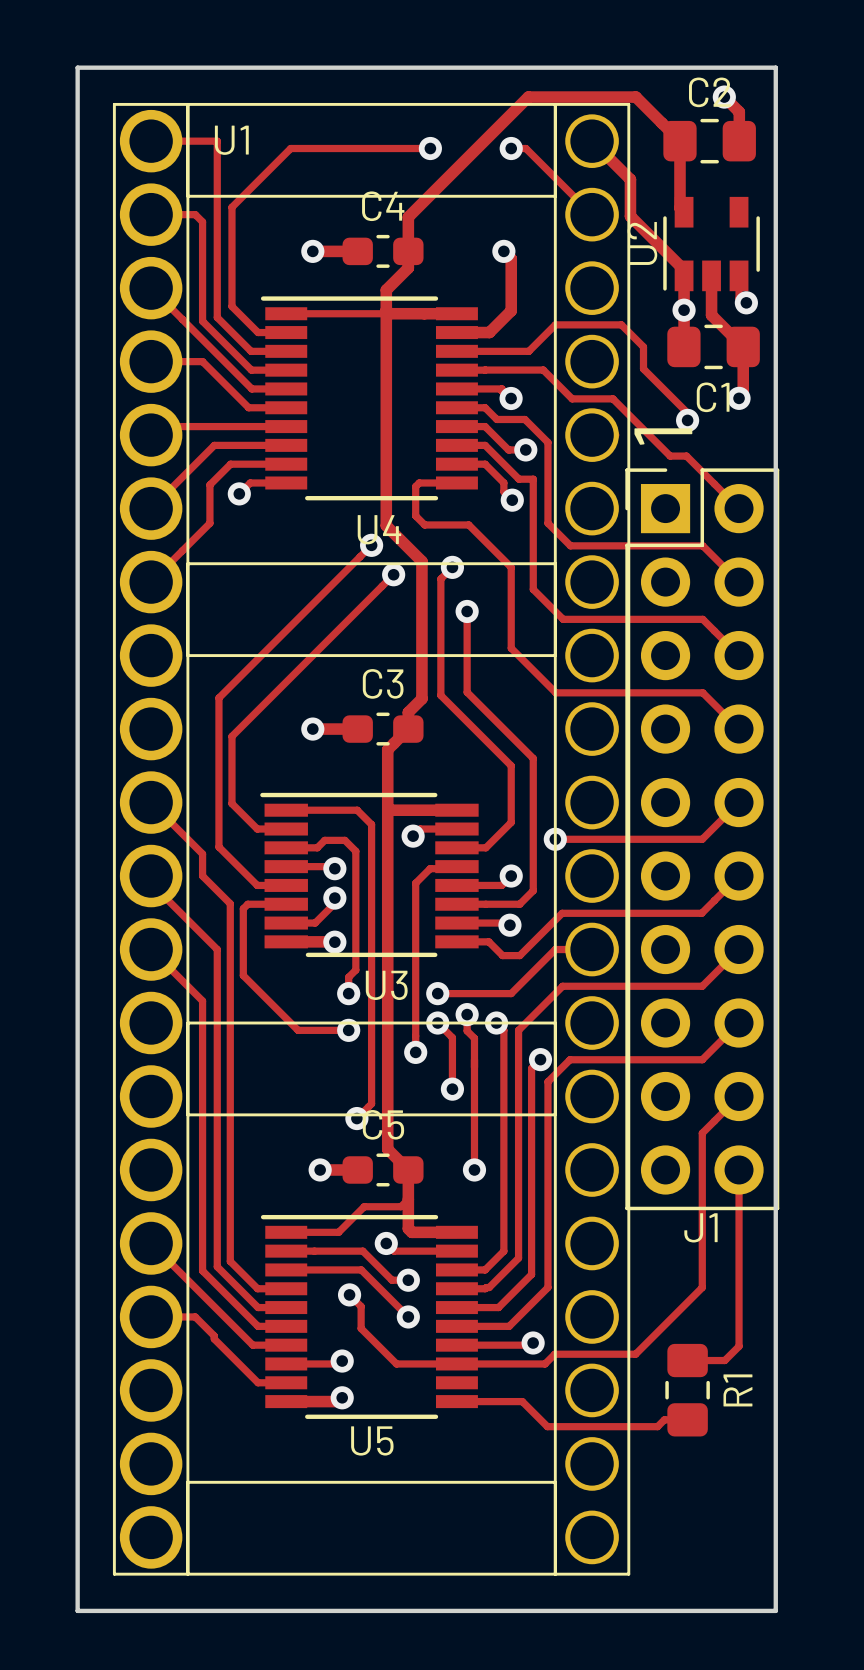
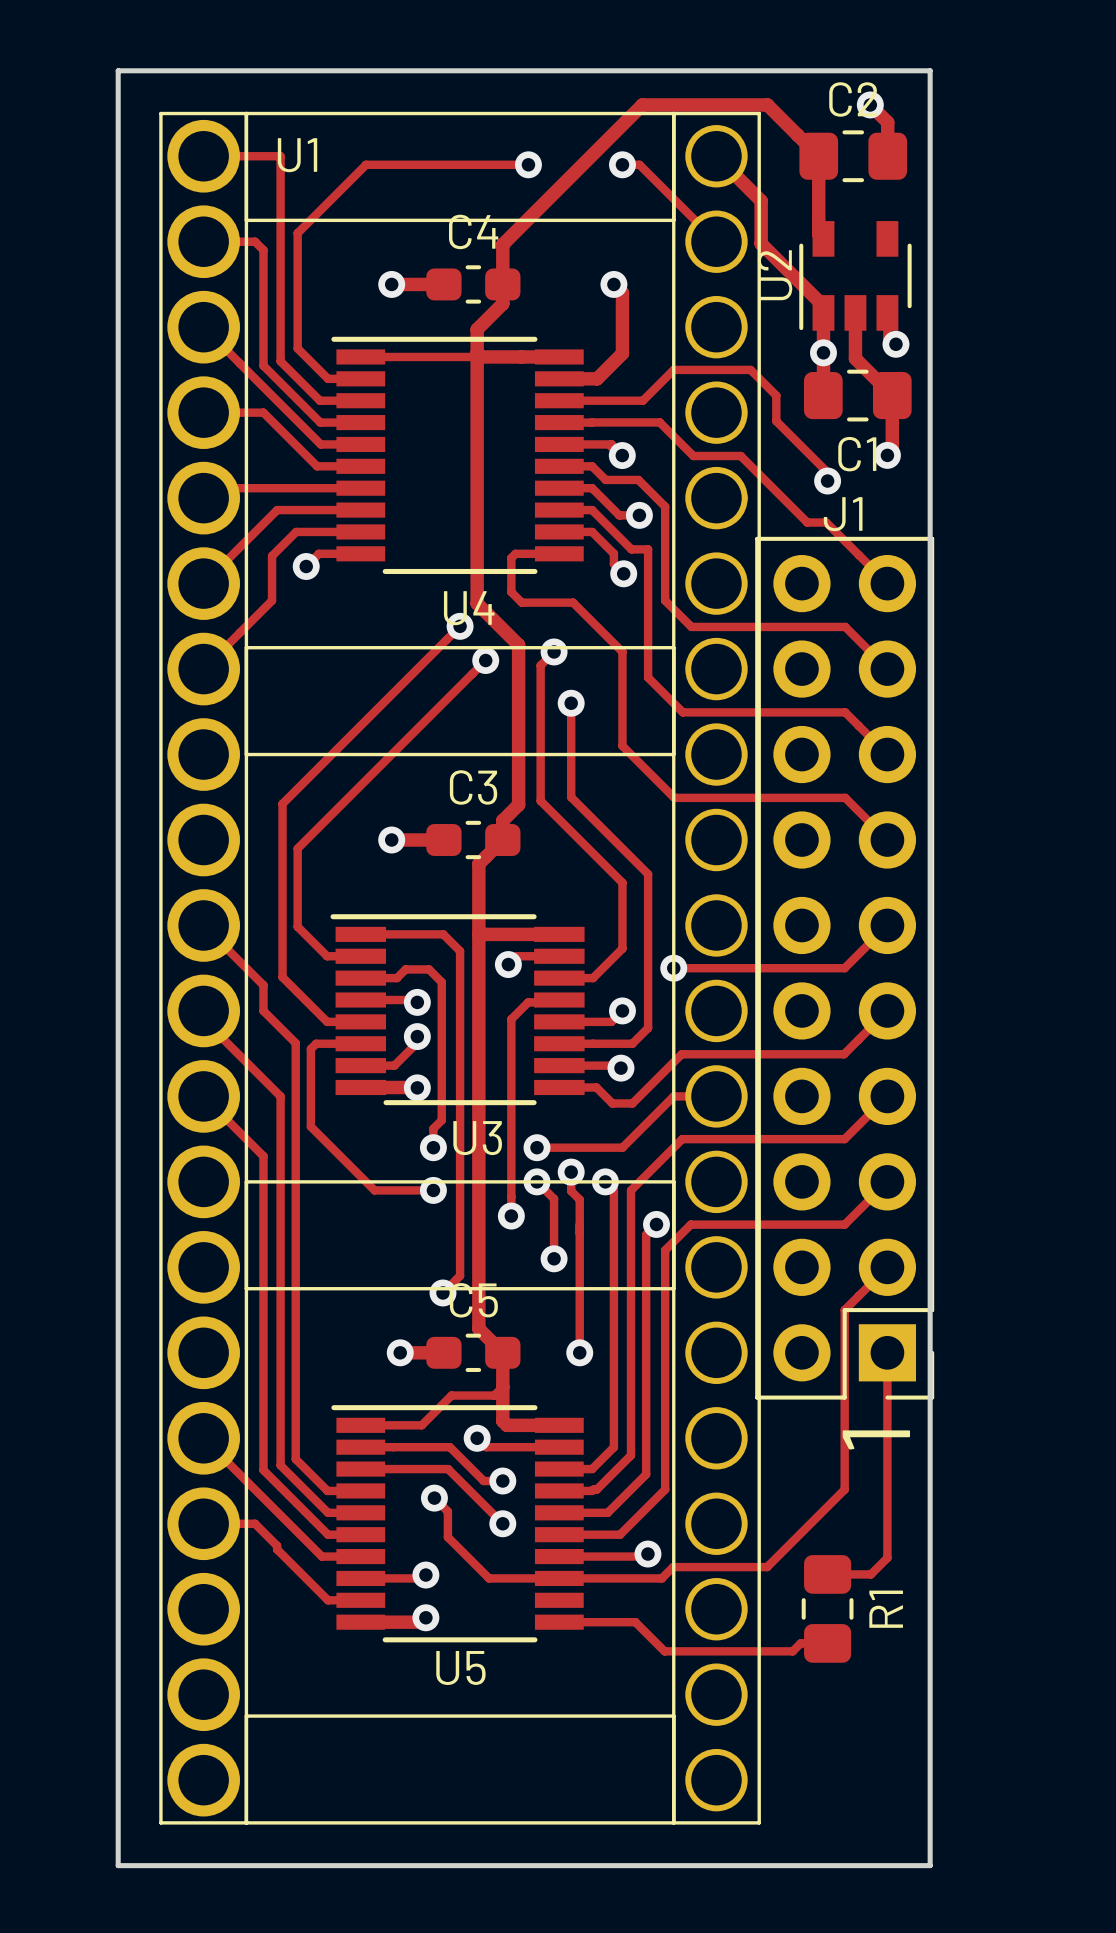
text: 1 (663, 436) -> none
J1 rotation: 0° (702, 839) -> 180° (844, 968)
text: none -> 1 (876, 1439)

